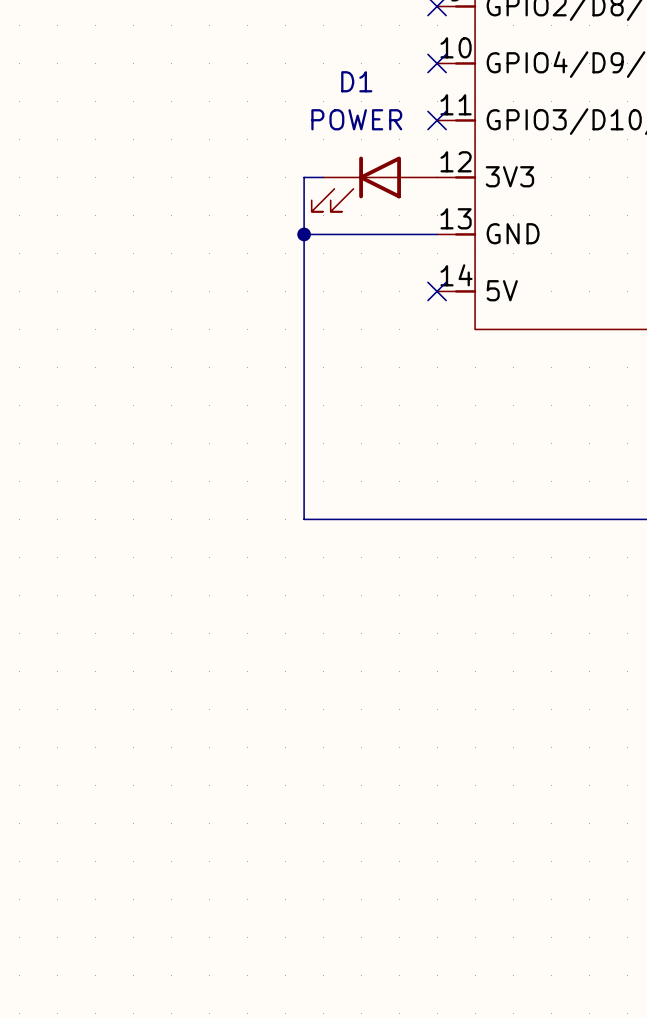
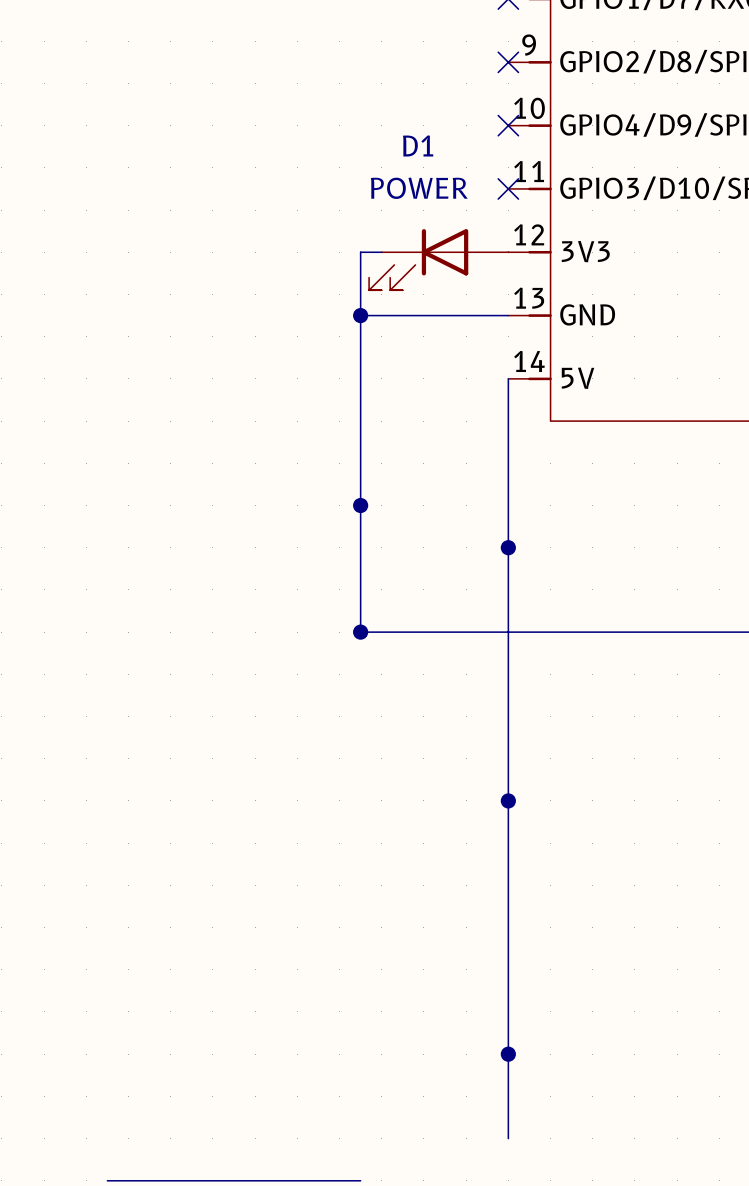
wire: none -> (508, 378) (508, 1138)
no-connect mark: (437, 291) -> none
junction: none -> (360, 505)
junction: none -> (508, 547)
junction: none -> (360, 632)
junction: none -> (508, 800)
junction: none -> (508, 1054)
wire: none -> (107, 1180) (360, 1180)

